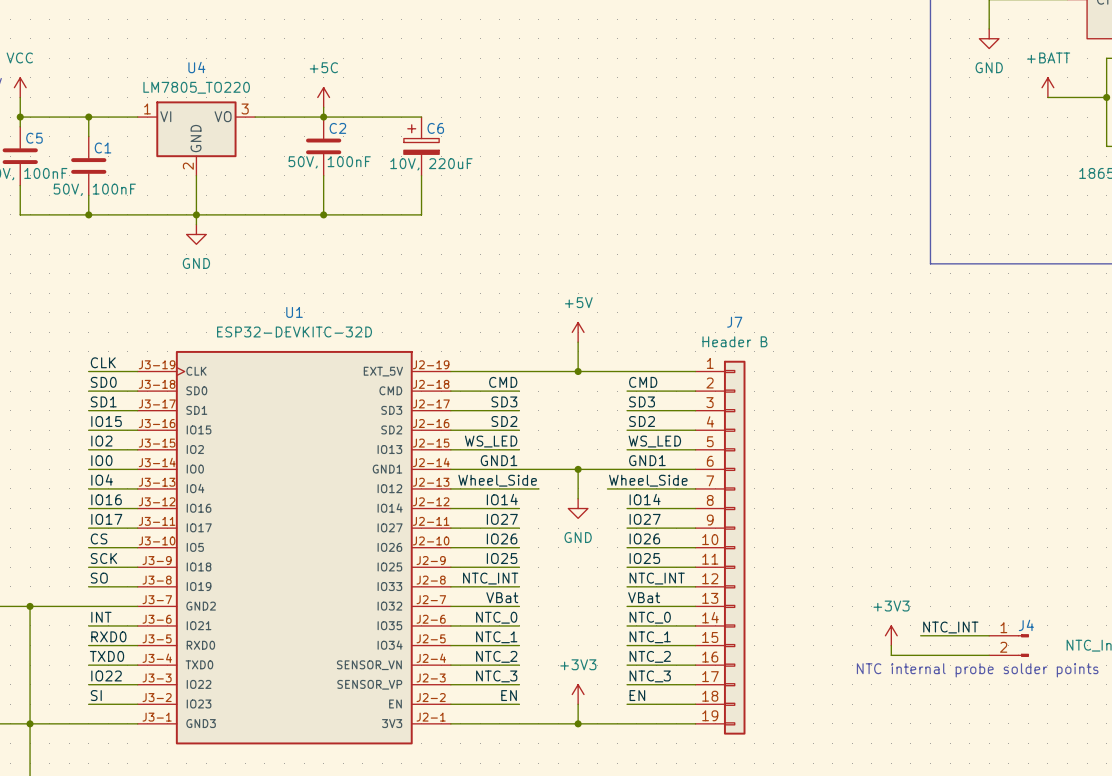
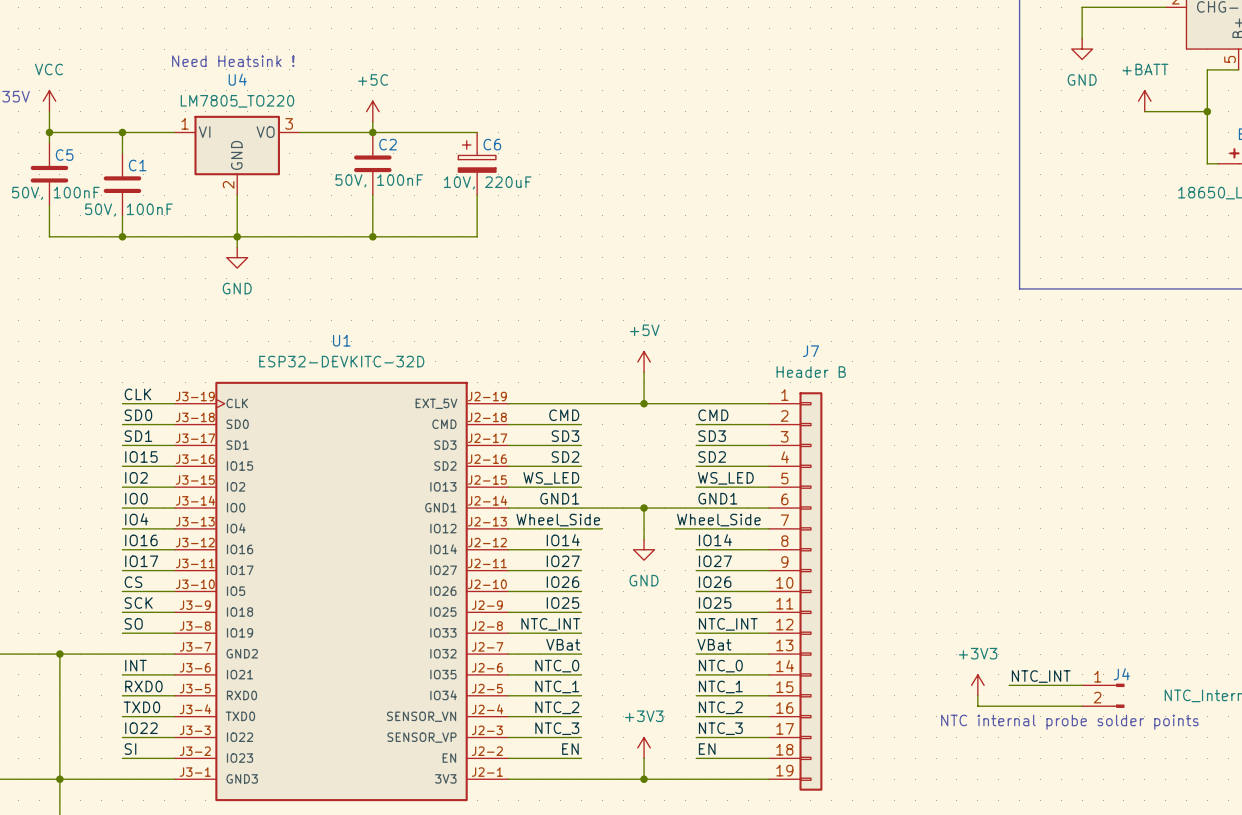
text: none -> Need Heatsink ! (233, 61)

